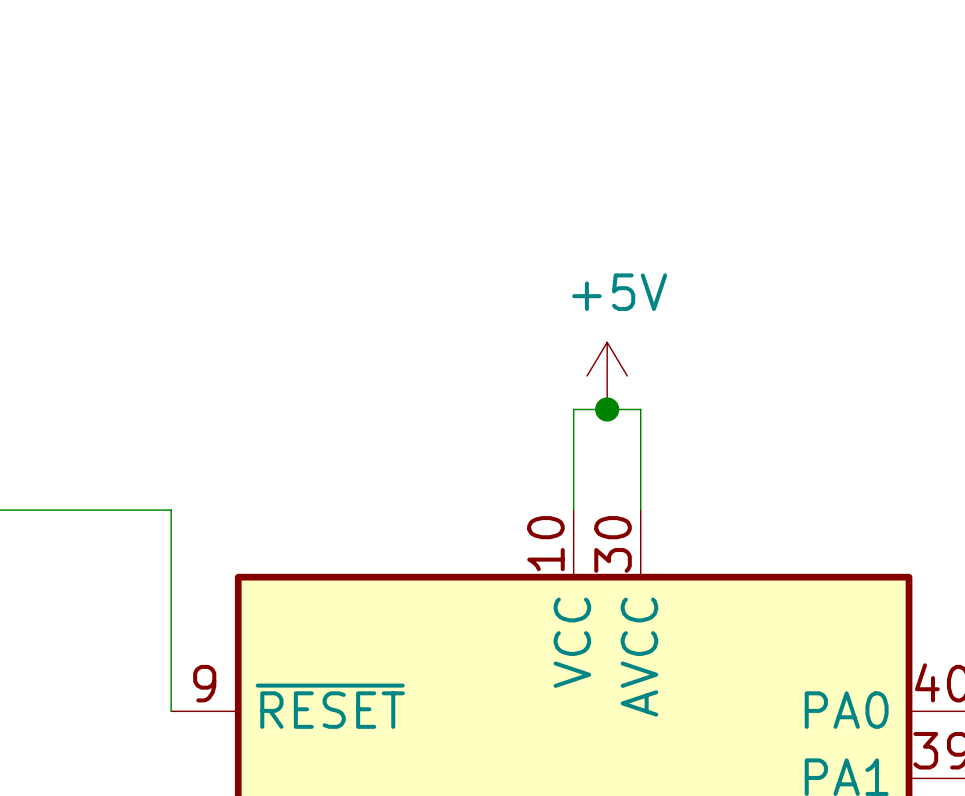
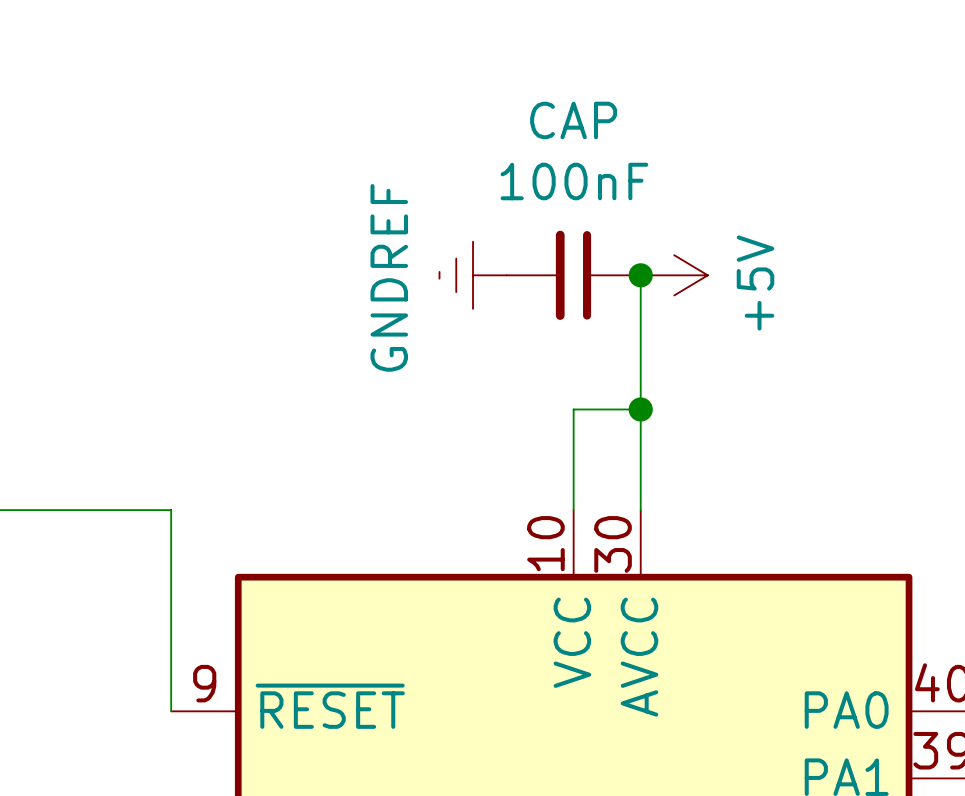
power symbol: none -> GNDREF (473, 275)
CAP: none -> 100nF (573, 275)
wire: none -> (640, 275) (640, 409)
junction: none -> (640, 275)
power symbol rotation: 0° (607, 375) -> 90° clockwise (674, 275)
power symbol position: +5V (607, 375) -> +5V (674, 275)
junction position: (607, 409) -> (640, 409)

